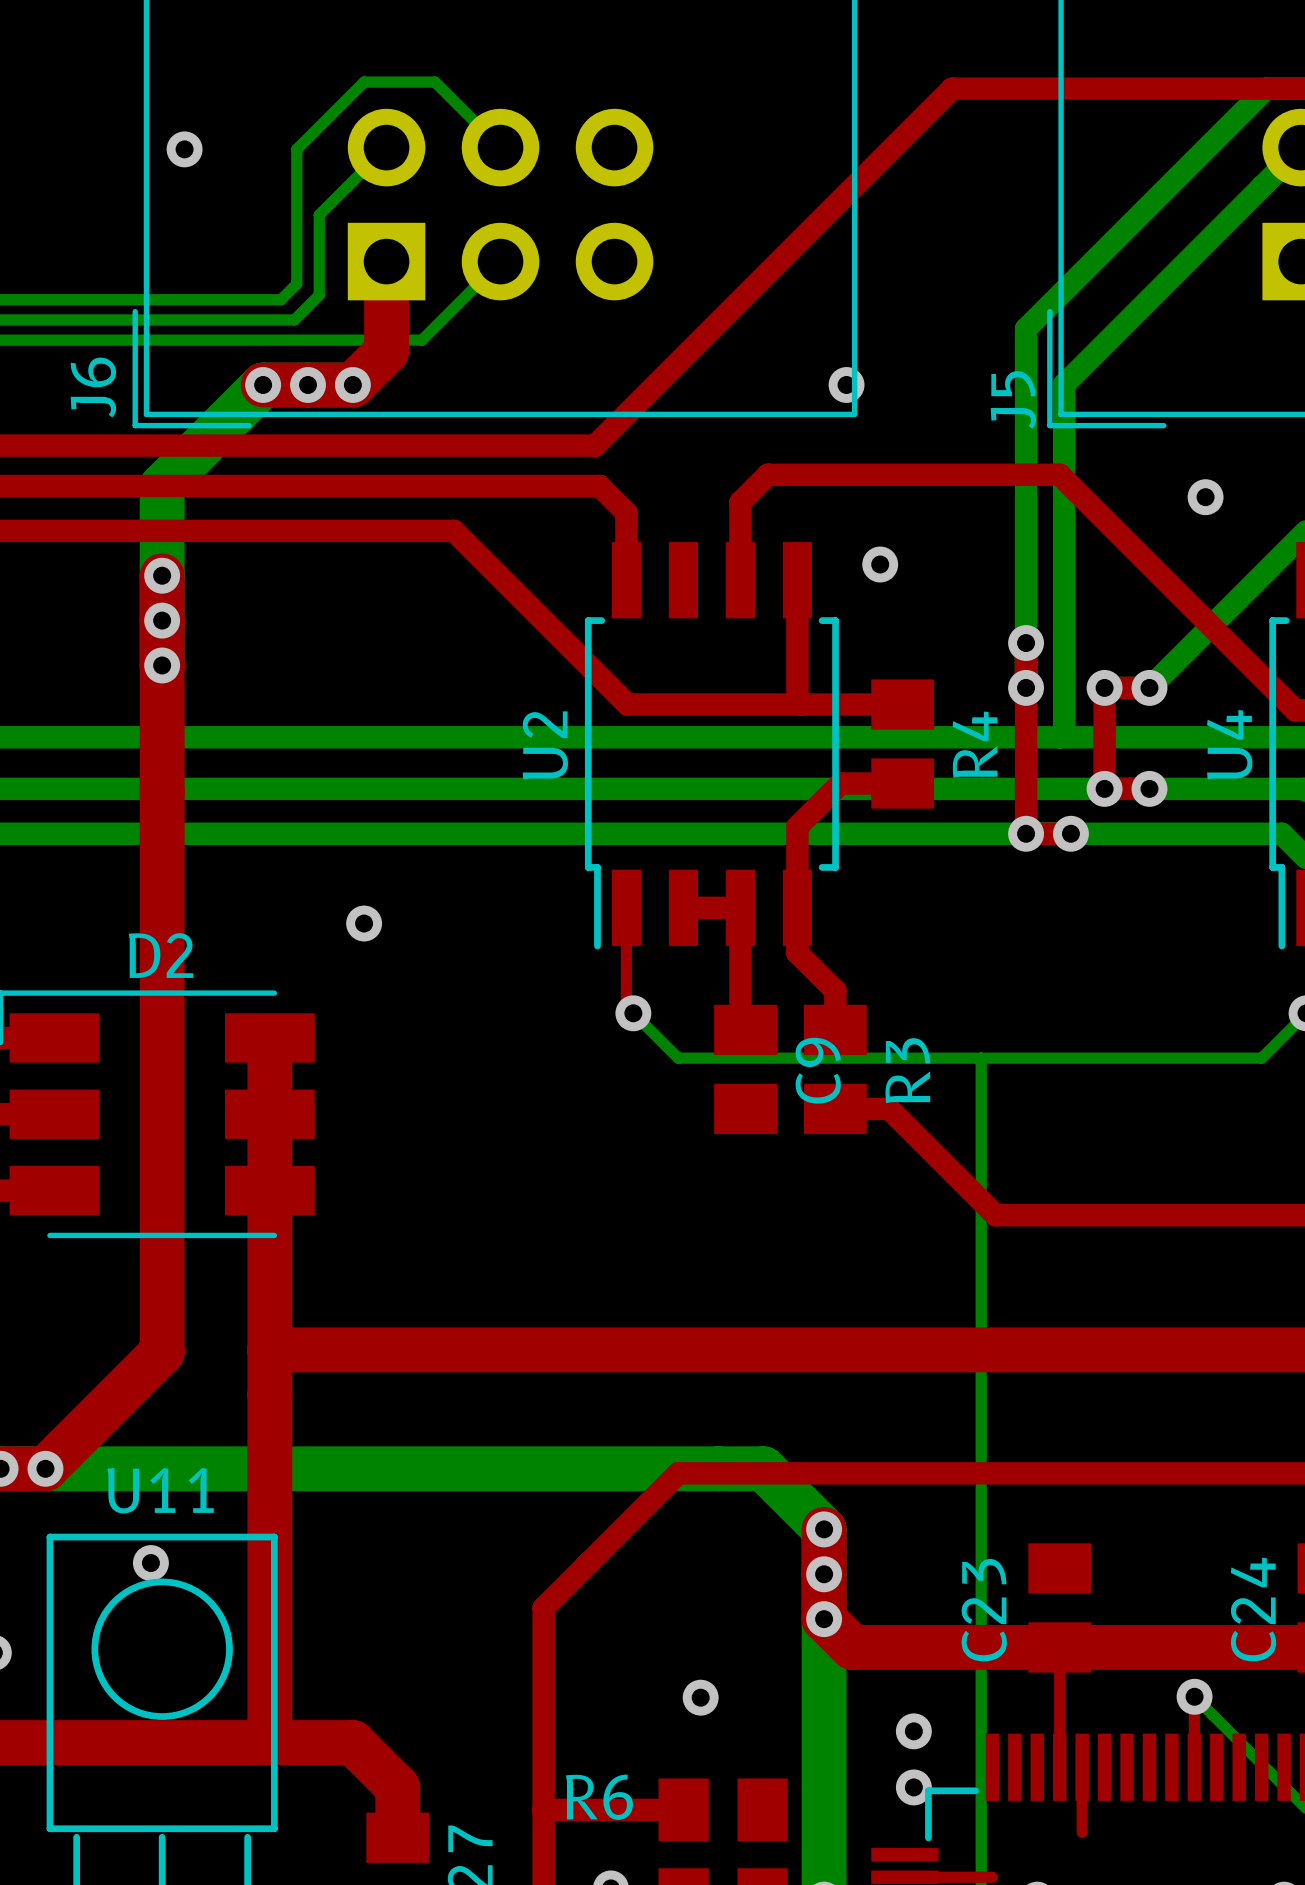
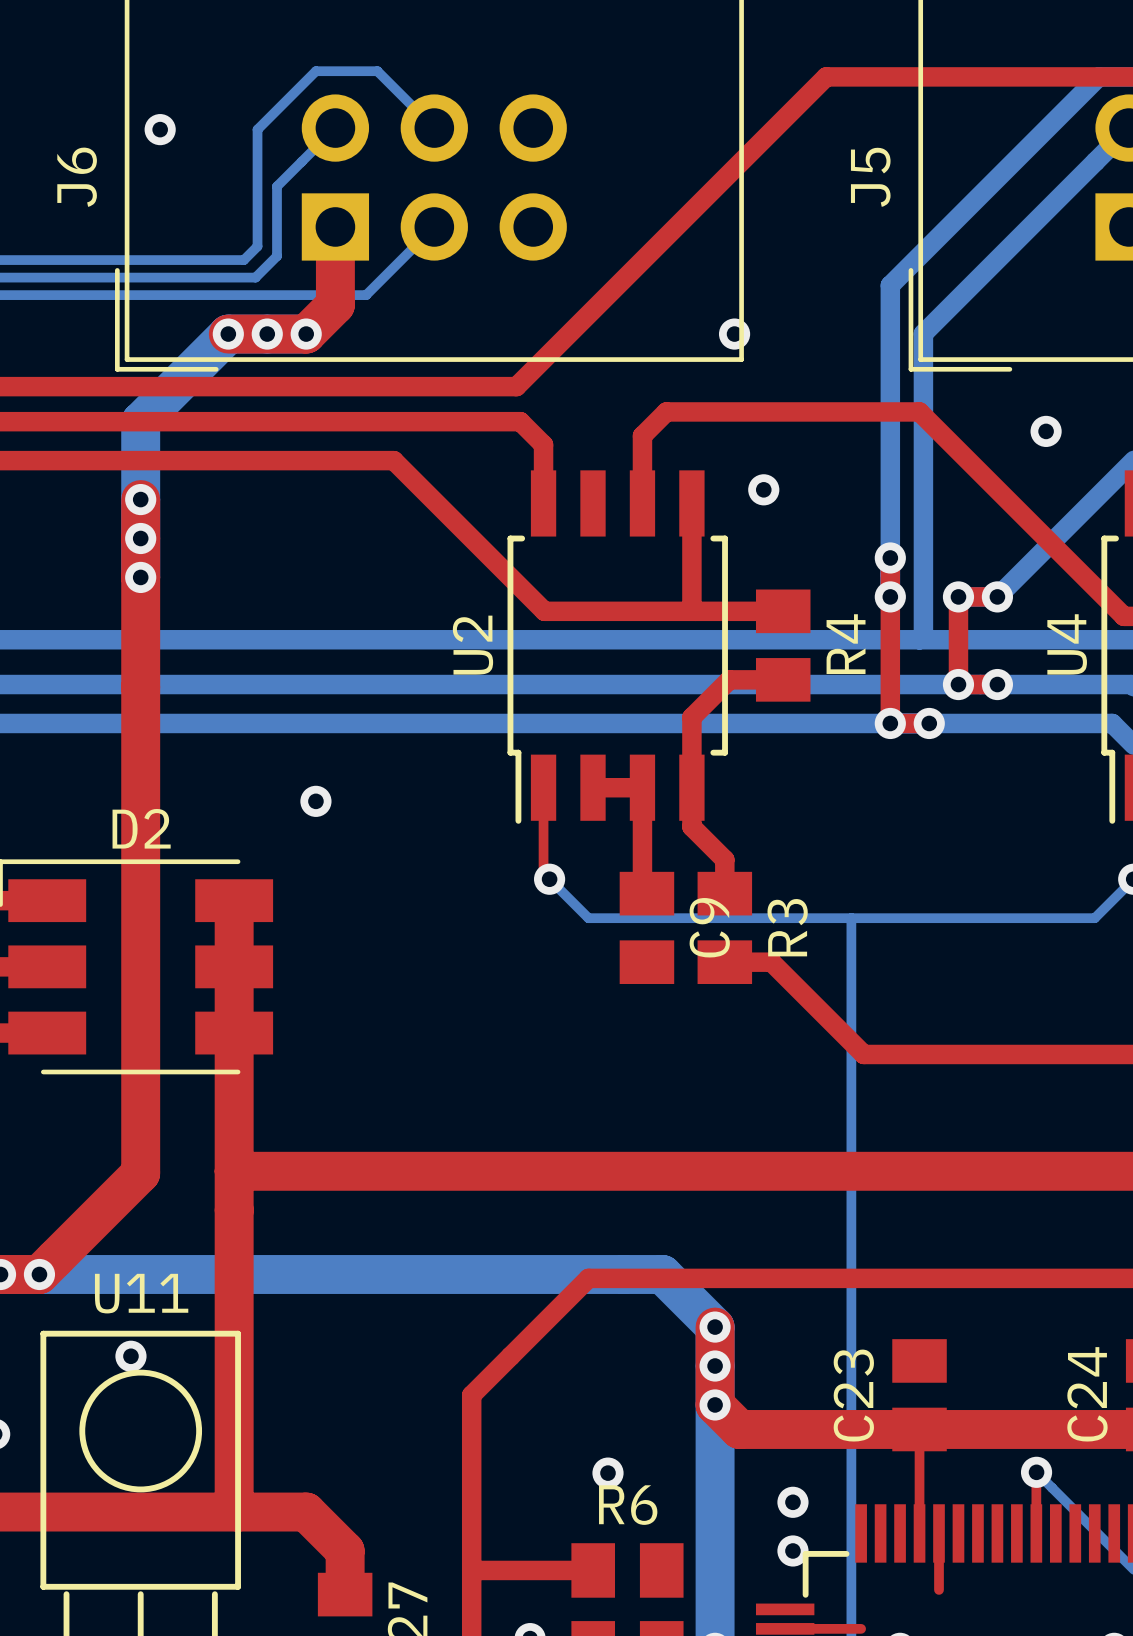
J6 name position: J6 (93, 387) -> J6 (77, 177)
J5 name position: J5 (1013, 399) -> J5 (870, 177)
R6 name position: R6 (599, 1797) -> R6 (628, 1505)

